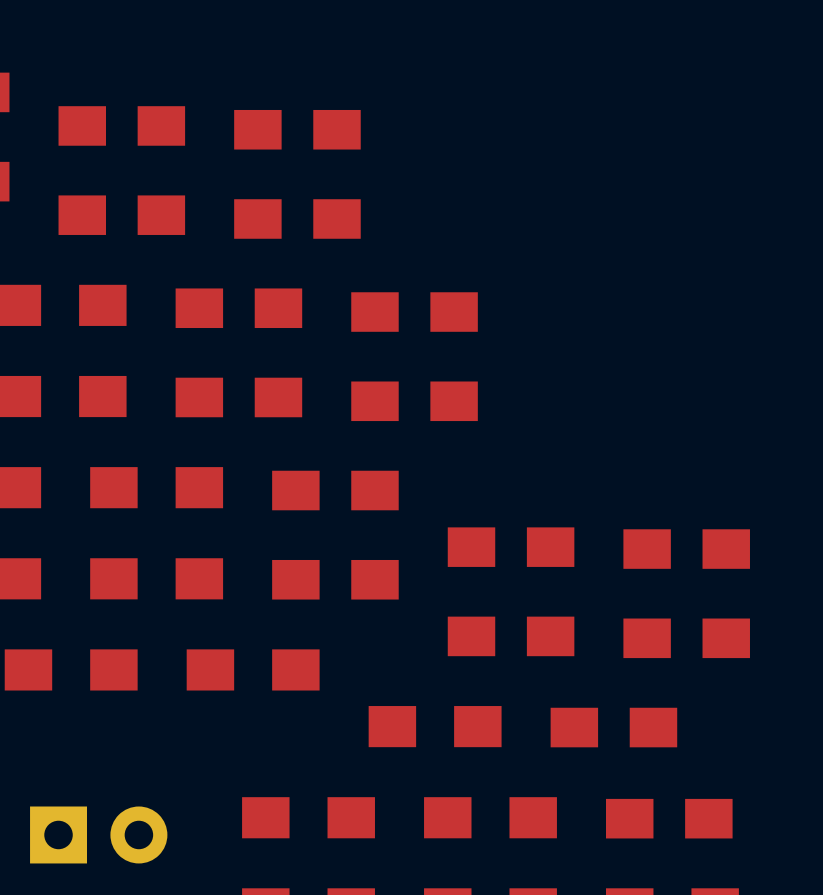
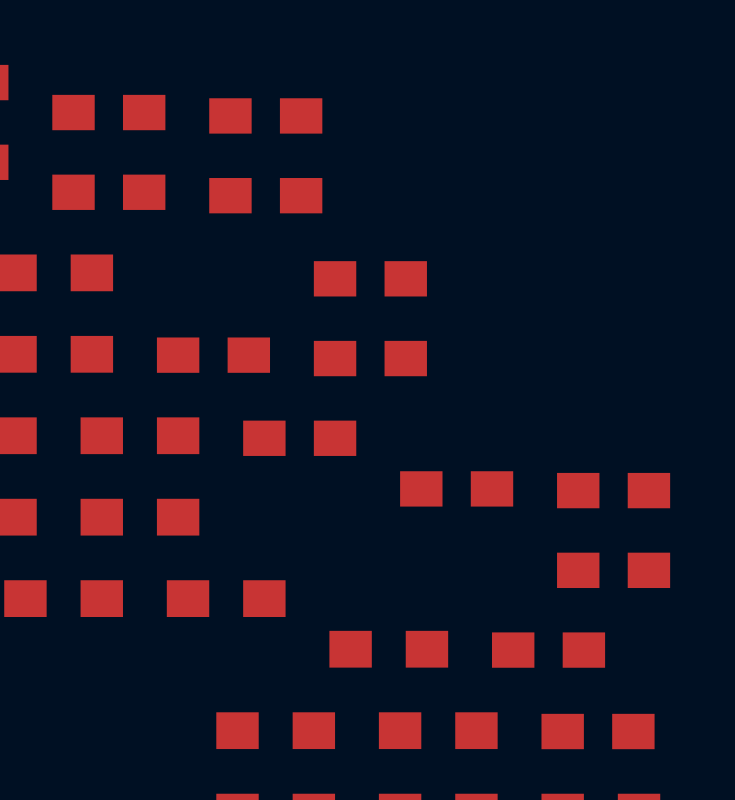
part: (238, 308) -> none
part: (335, 579) -> none
part: (511, 636) -> none
part: (98, 834) -> none

